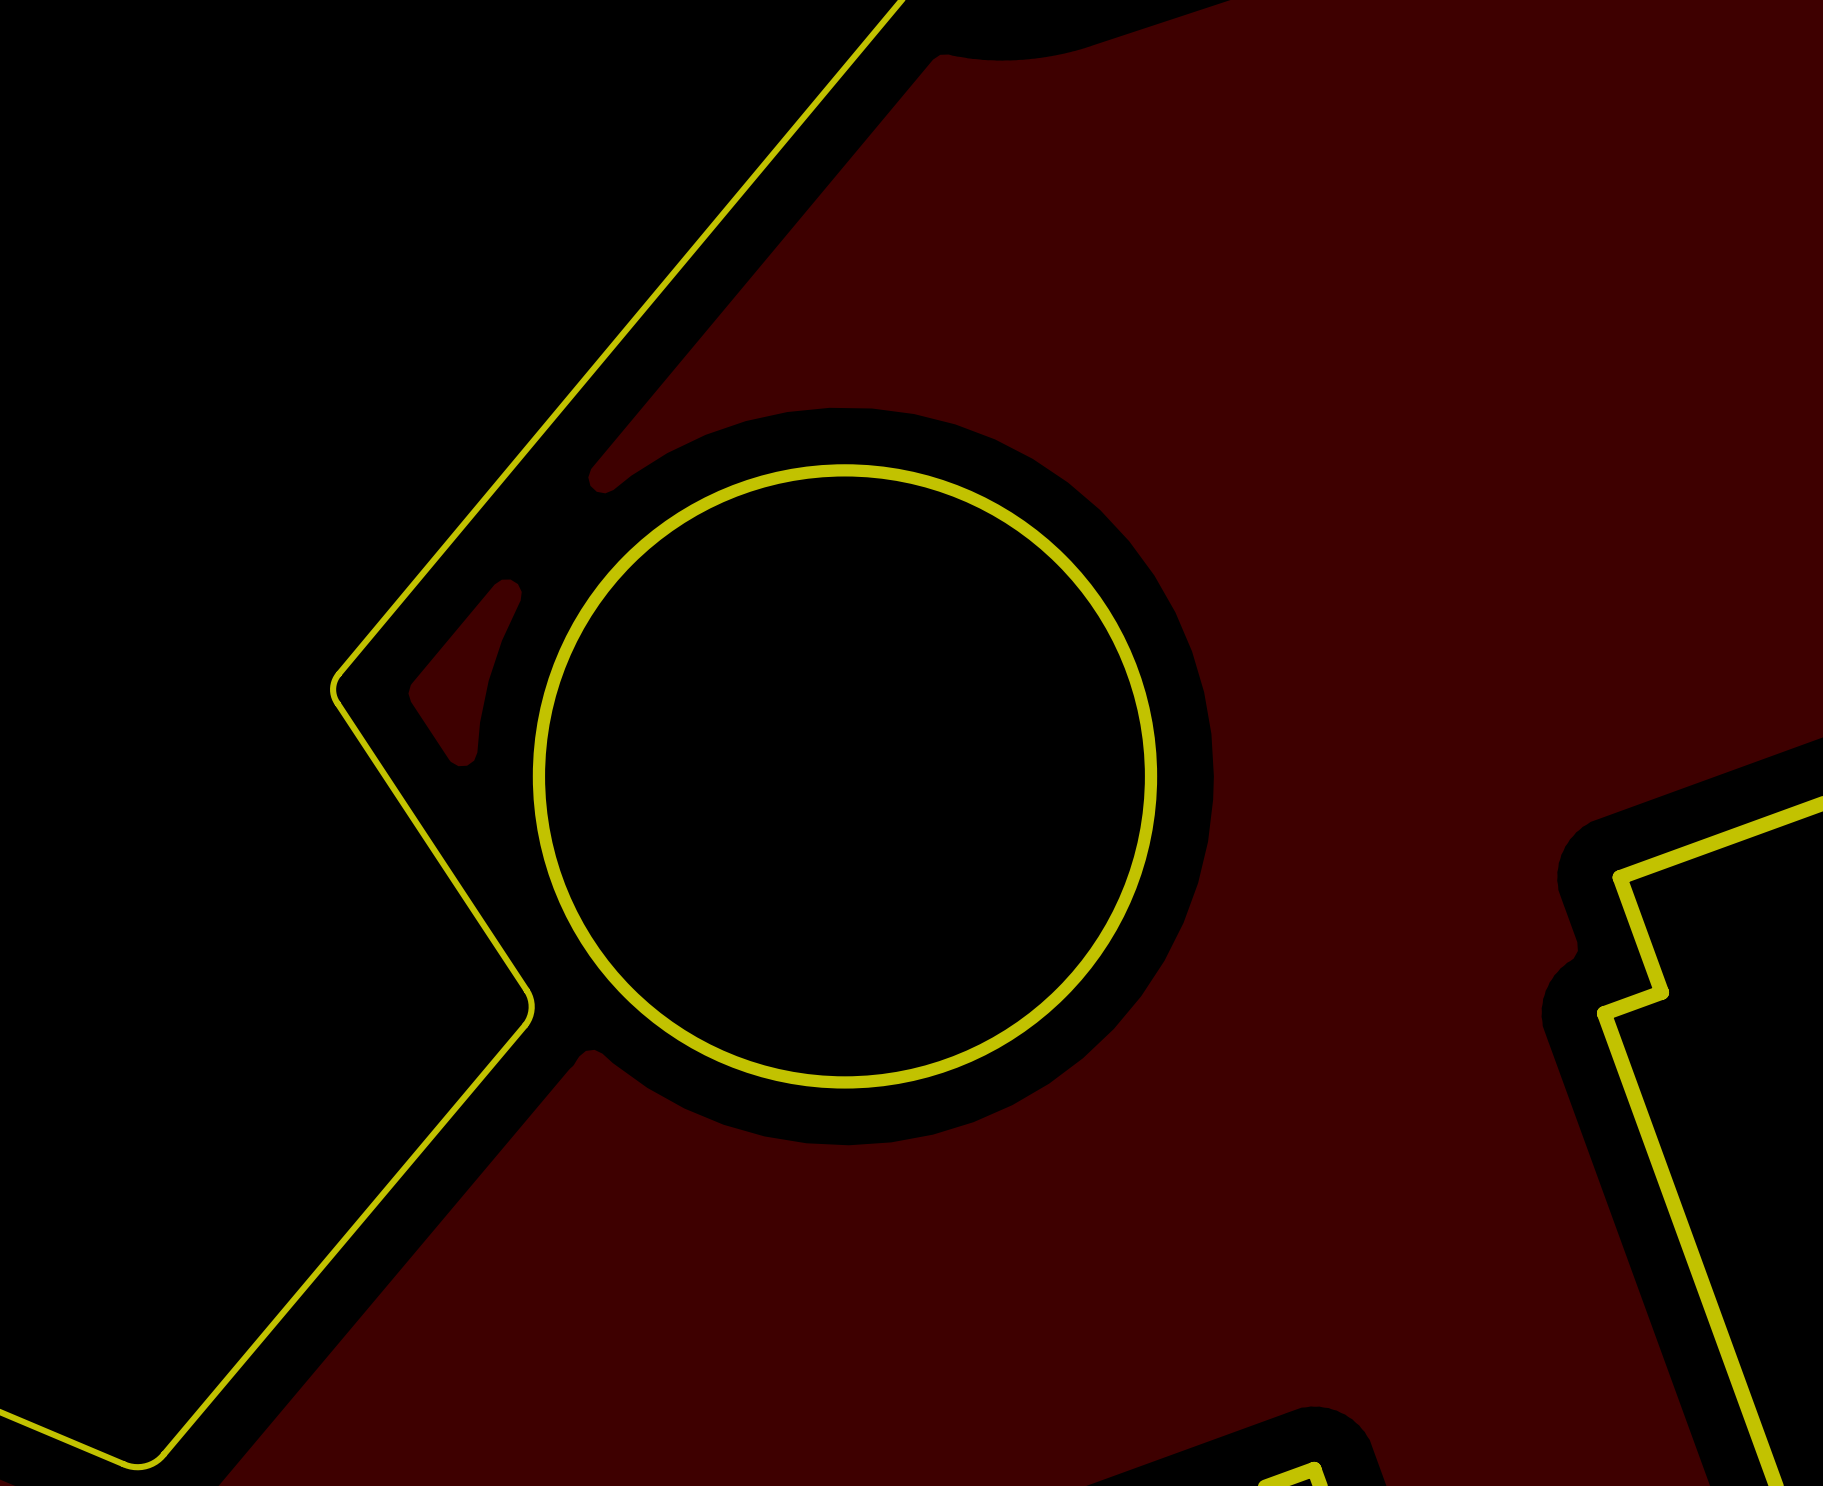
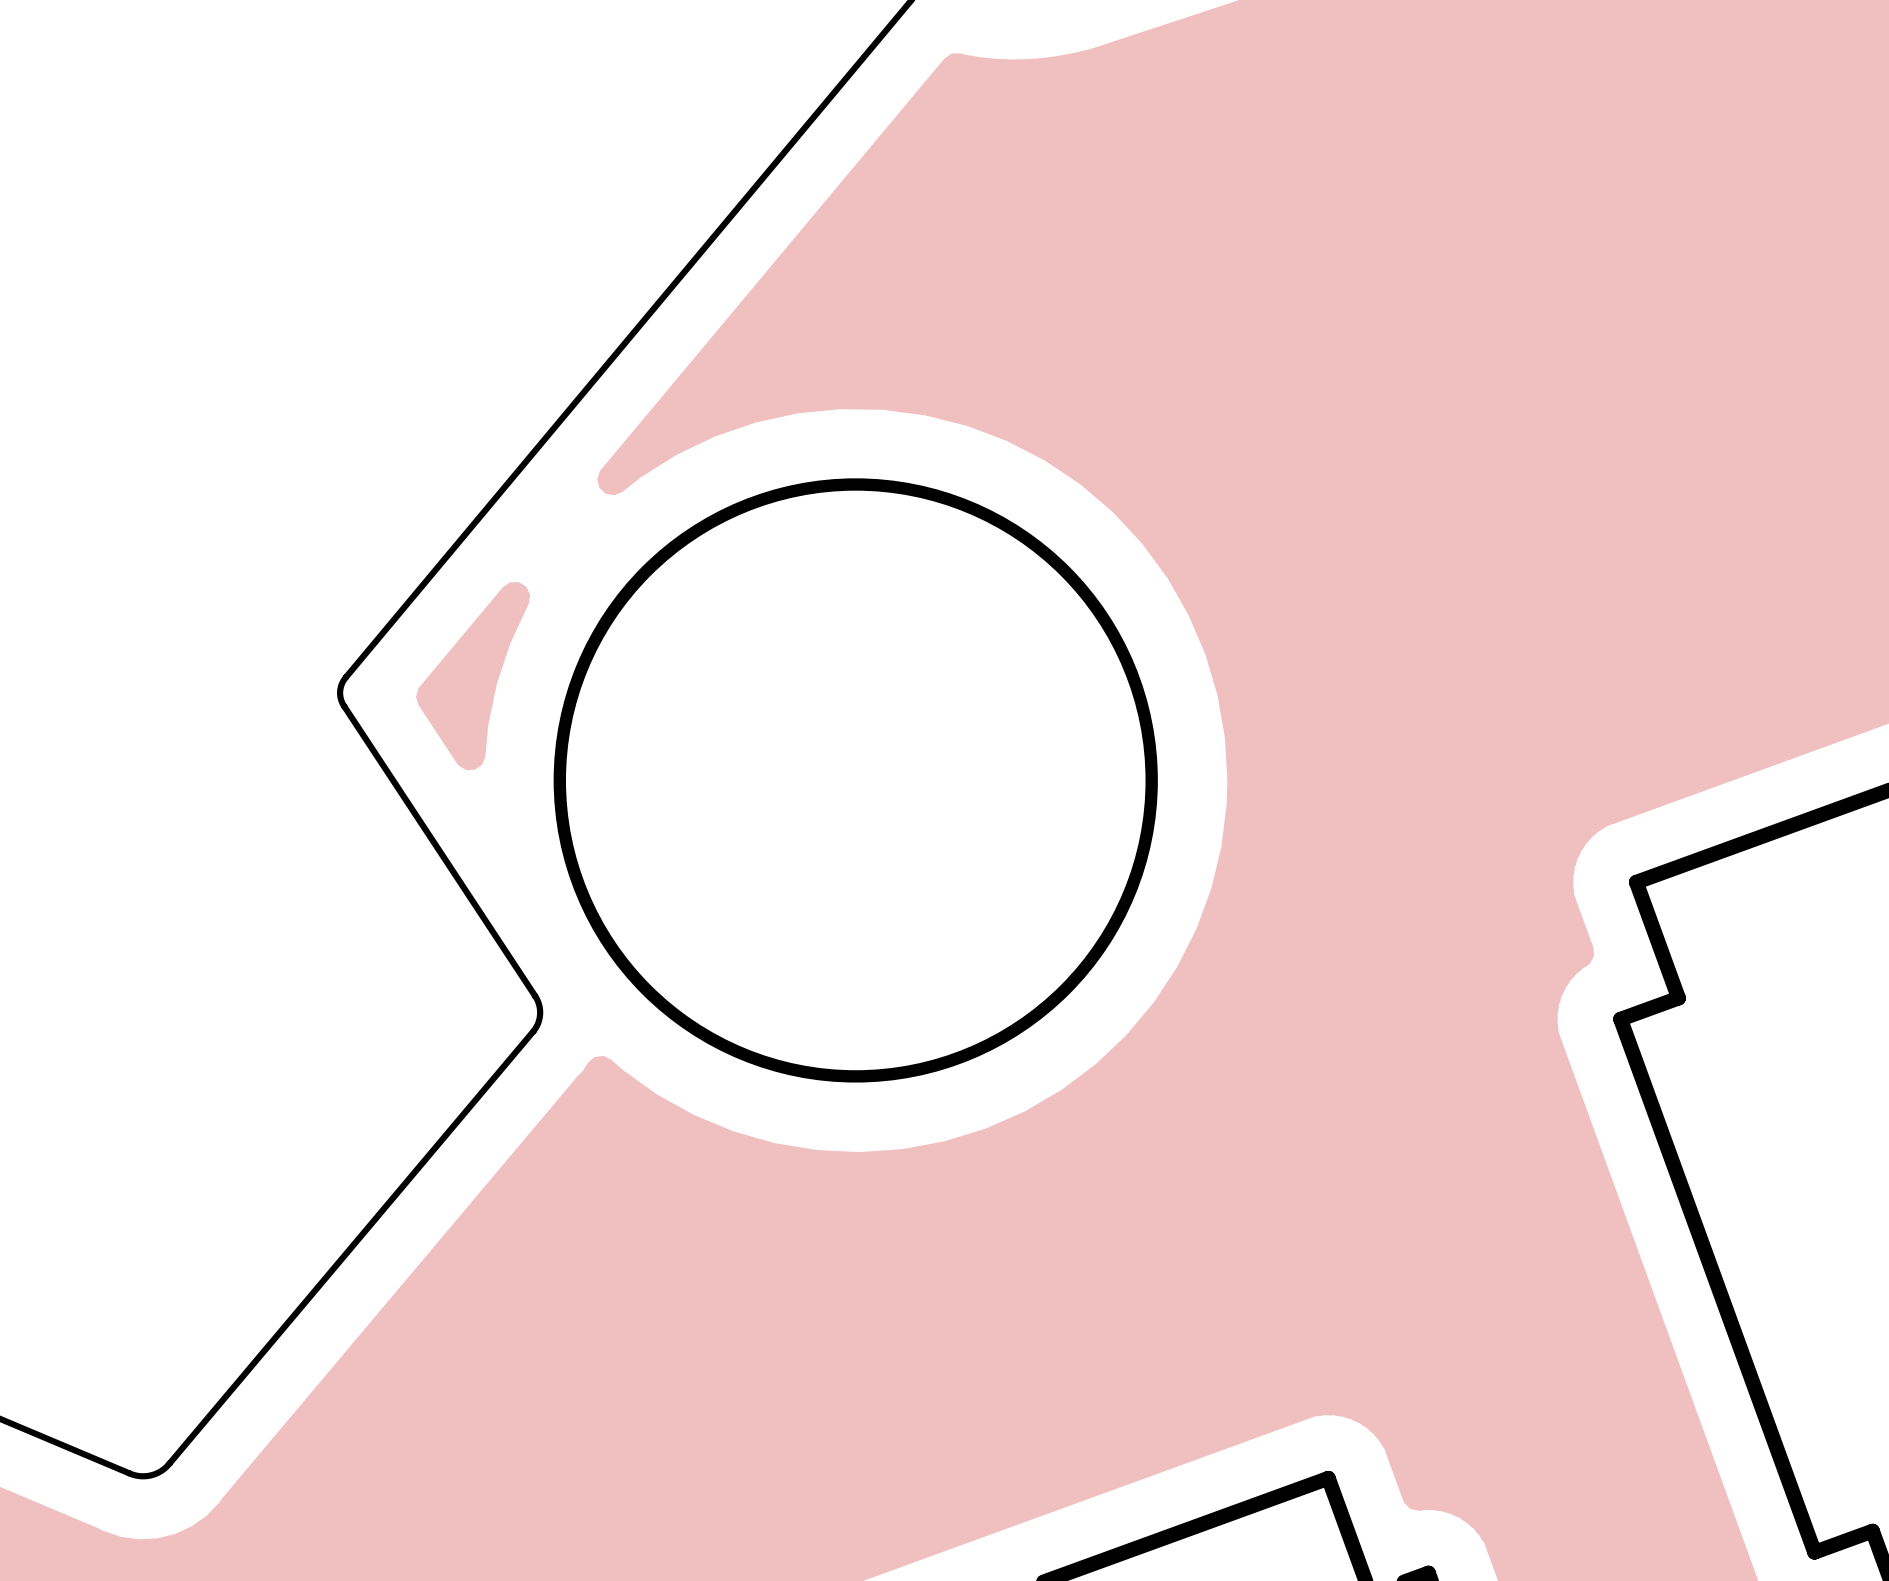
round board edge size: [532, 464, 1158, 1089] -> [553, 478, 1158, 1083]

